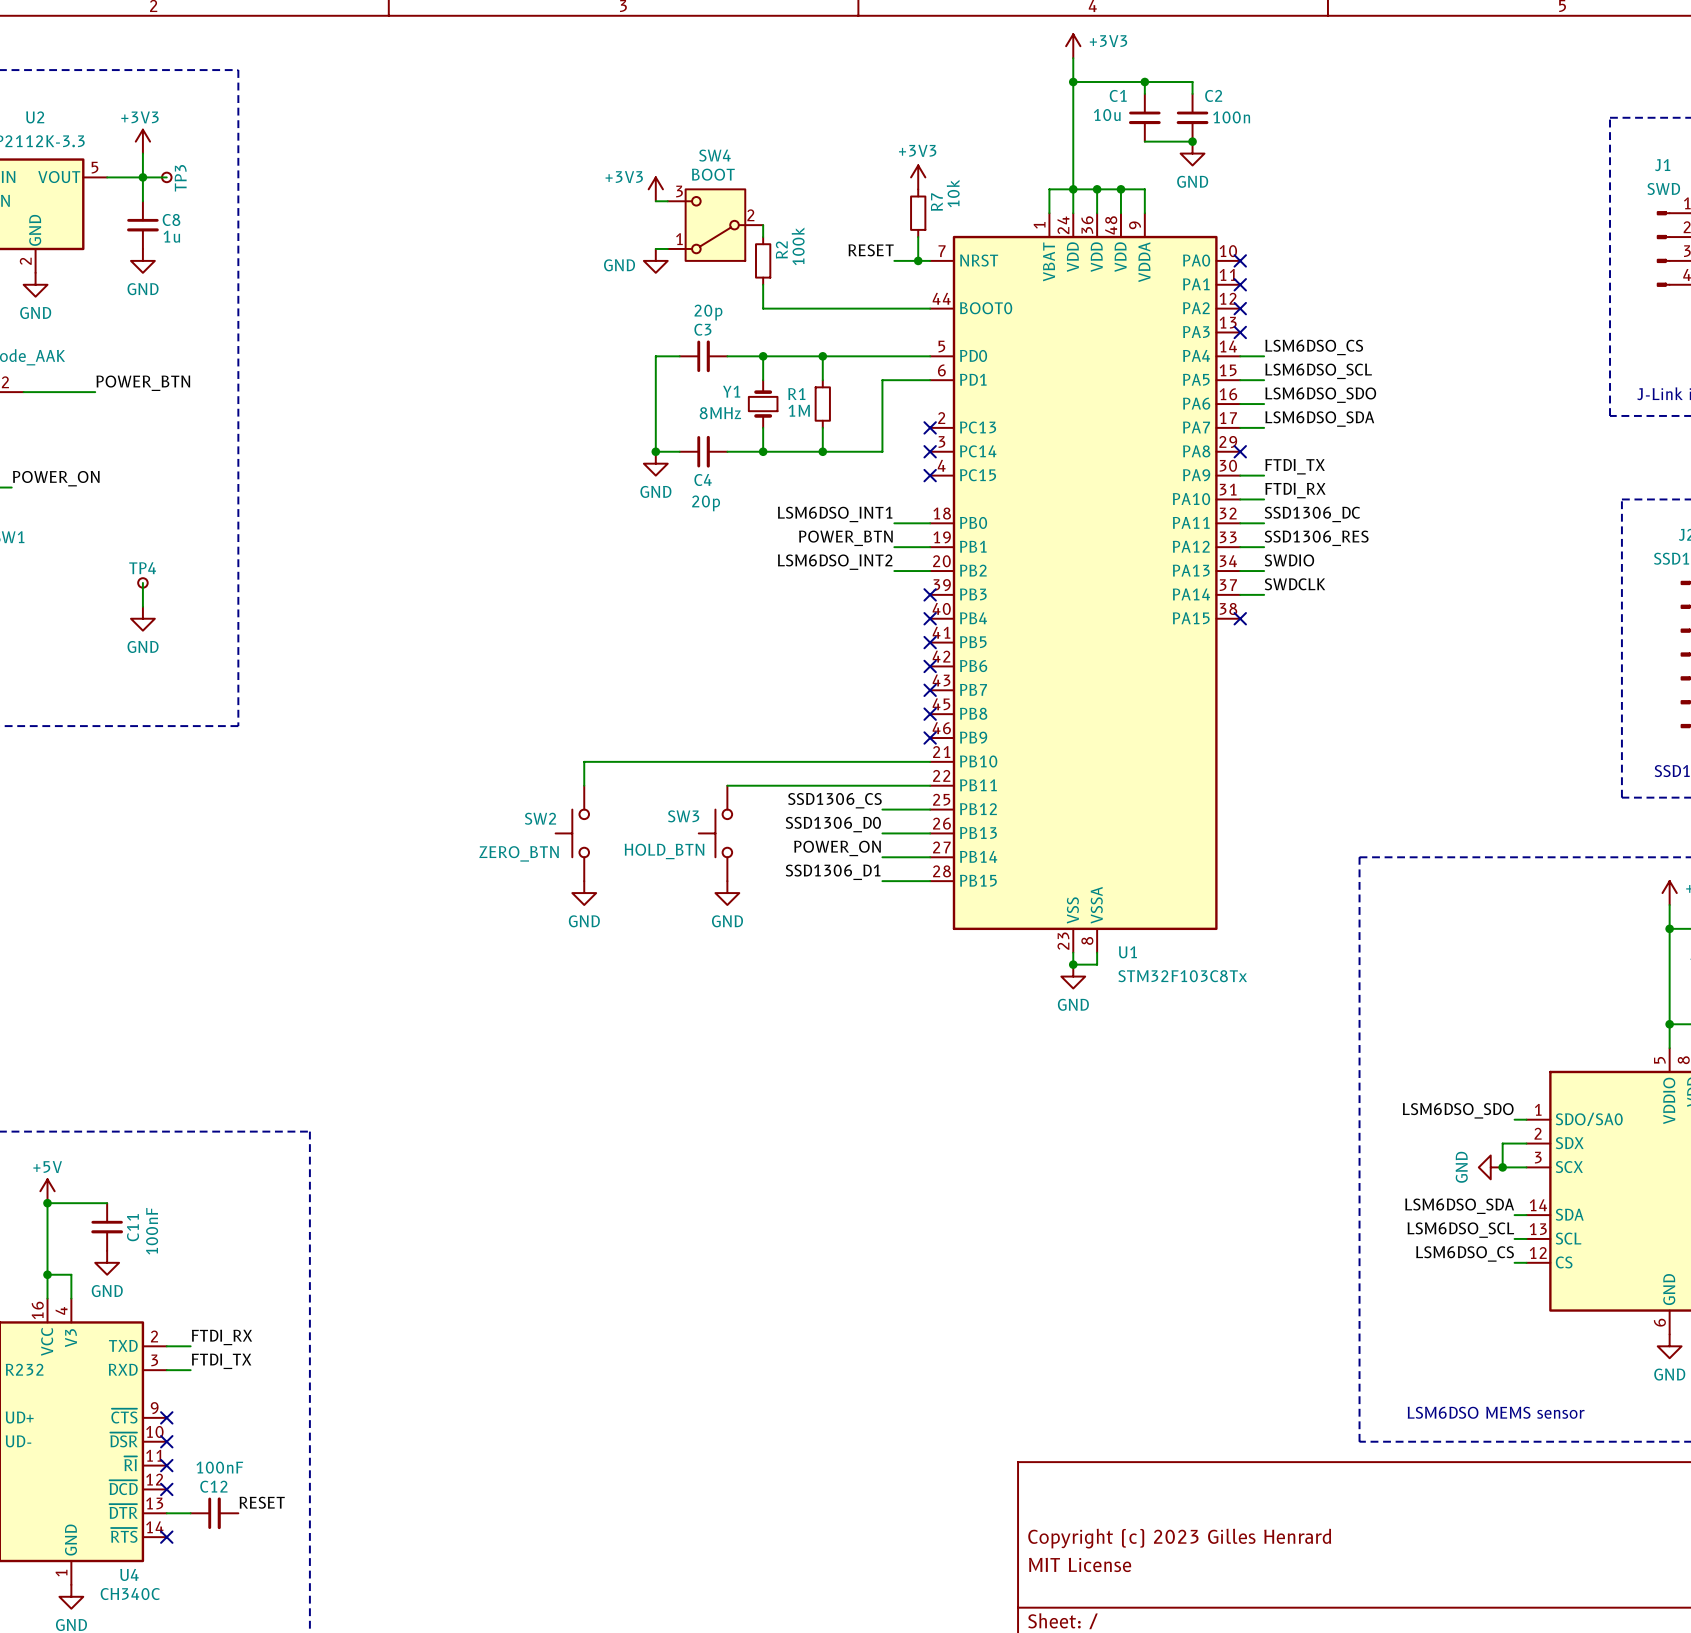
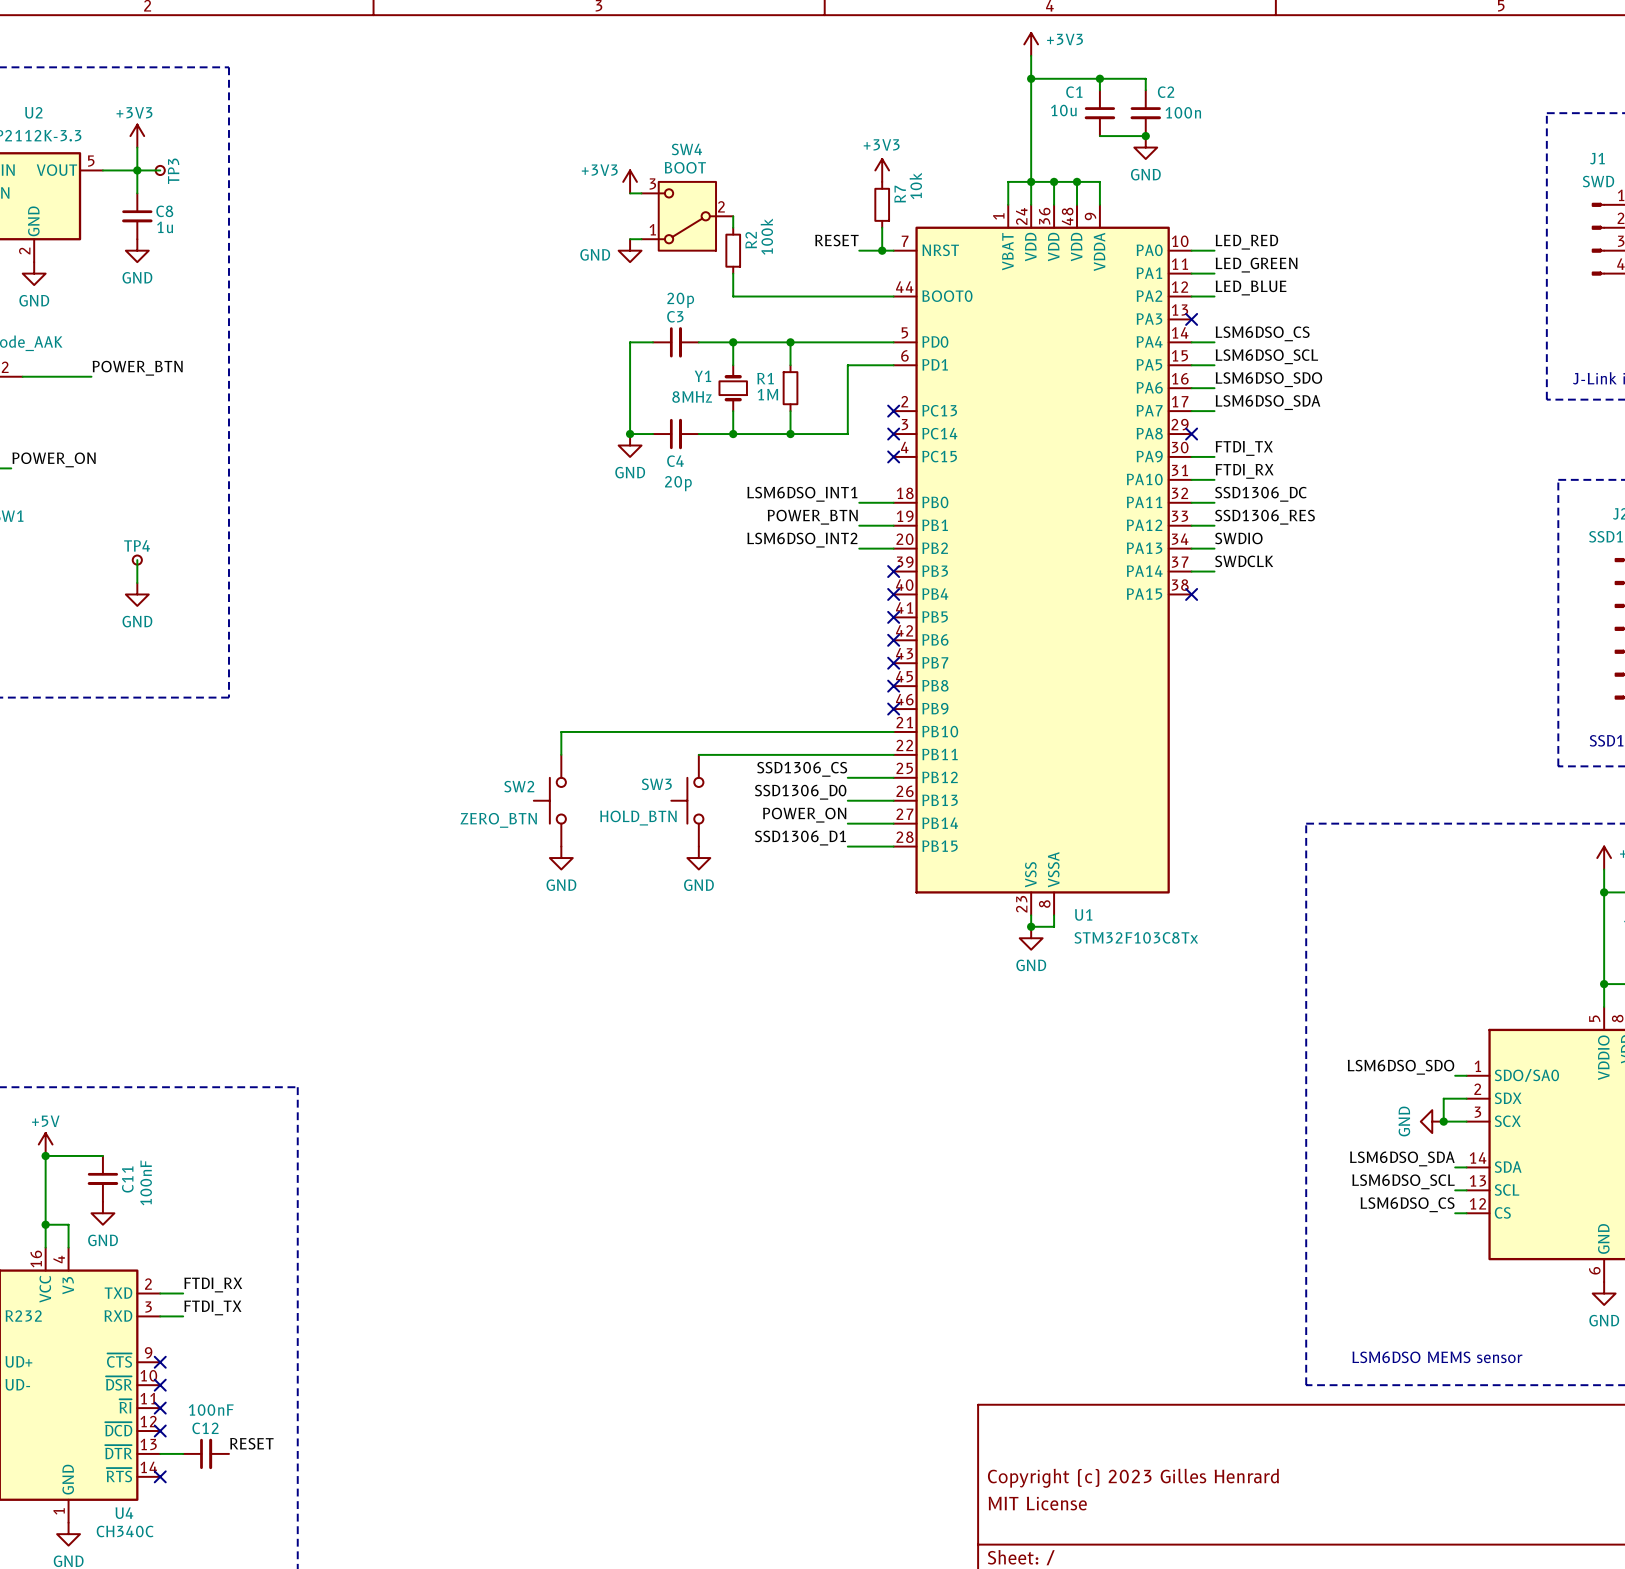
label: none -> LED_RED (1246, 242)
wire: none -> (1191, 250) (1214, 250)
no-connect mark: (1240, 260) -> none
label: none -> LED_GREEN (1256, 265)
wire: none -> (1191, 273) (1214, 273)
no-connect mark: (1240, 284) -> none
label: none -> LED_BLUE (1251, 288)
wire: none -> (1191, 296) (1214, 296)
no-connect mark: (1240, 308) -> none

